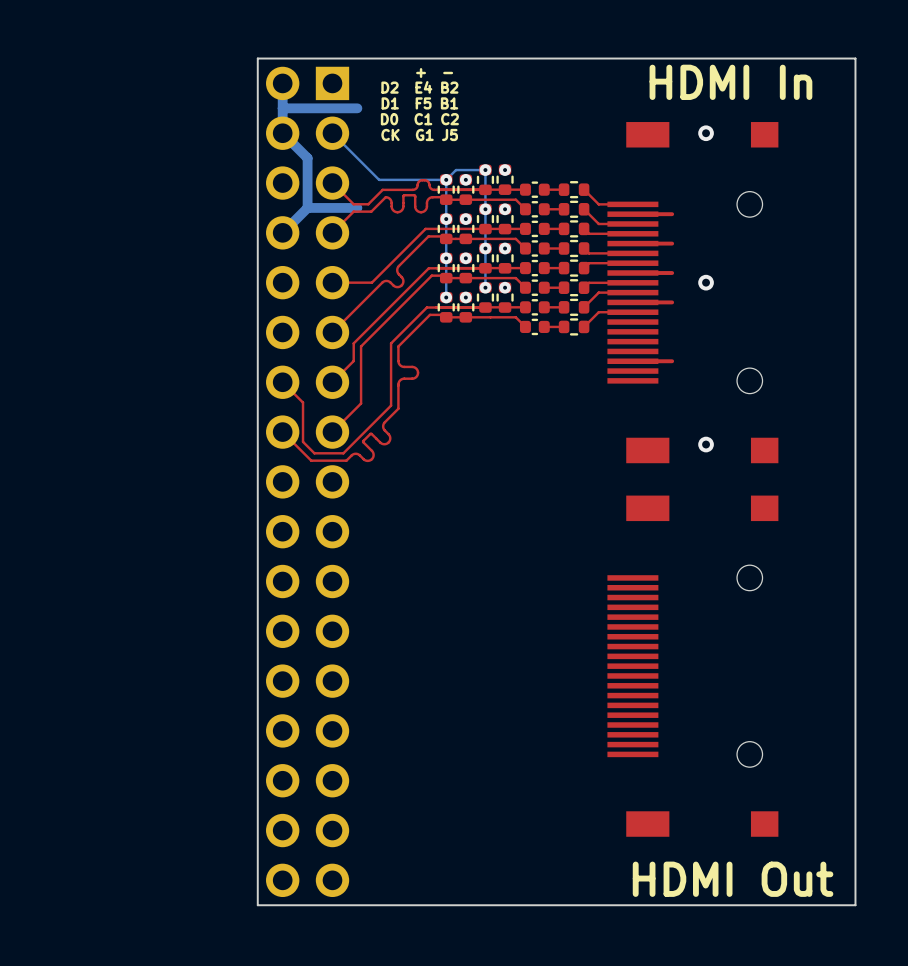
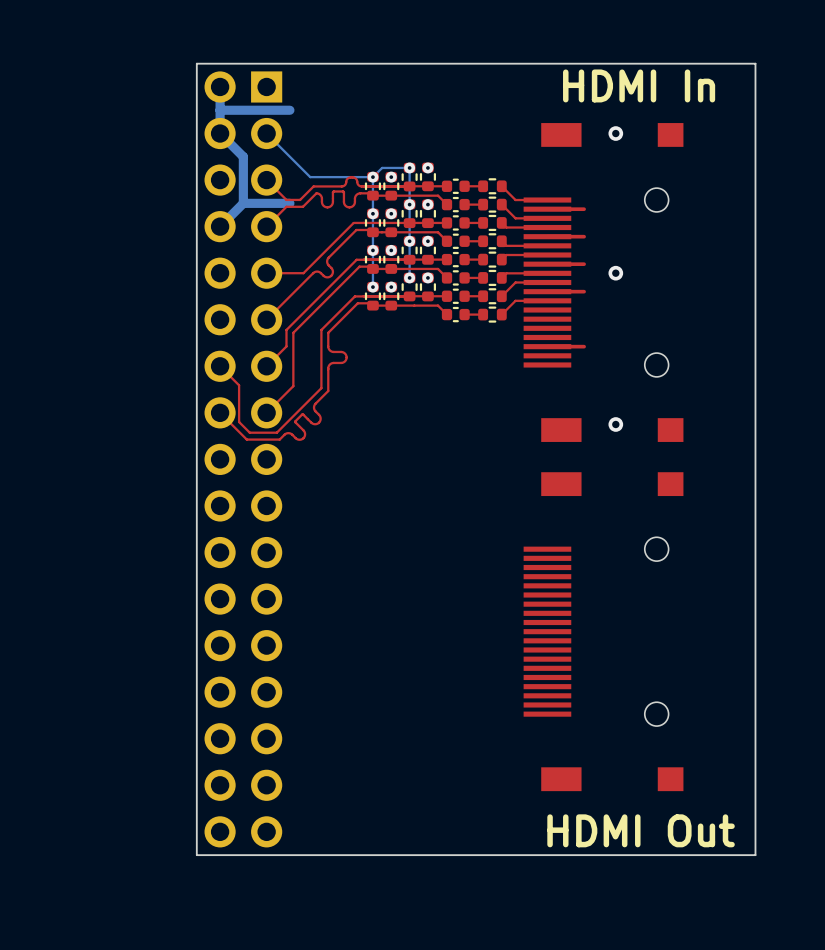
text: + - (434, 73) -> none
text: D2 E4 B2 (419, 87) -> none
text: D1 F5 B1 (419, 103) -> none
text: D0 C1 C2 (419, 119) -> none
text: CK G1 J5 (419, 134) -> none

